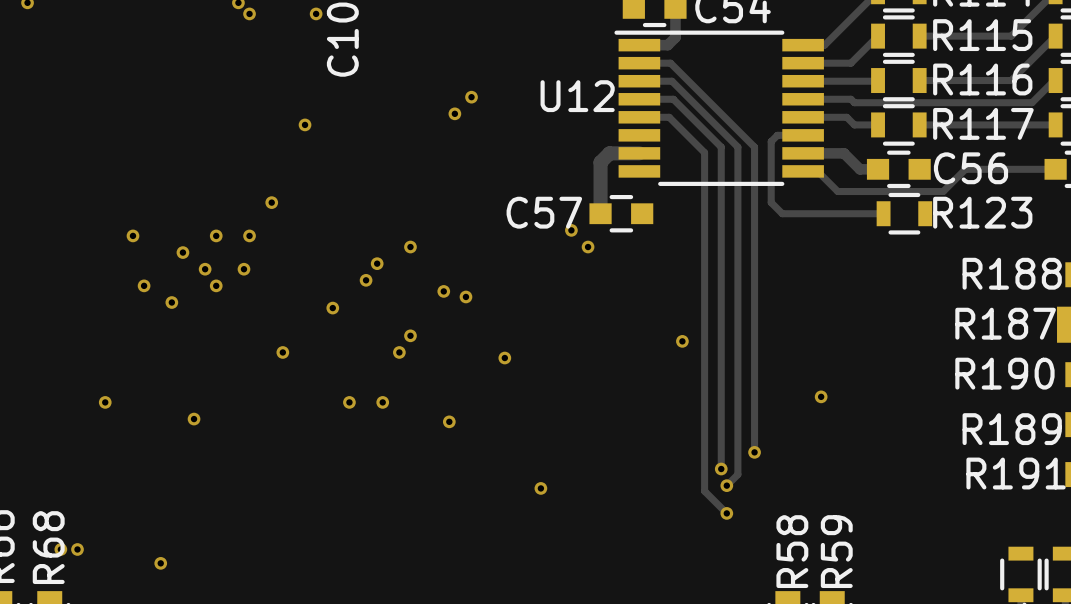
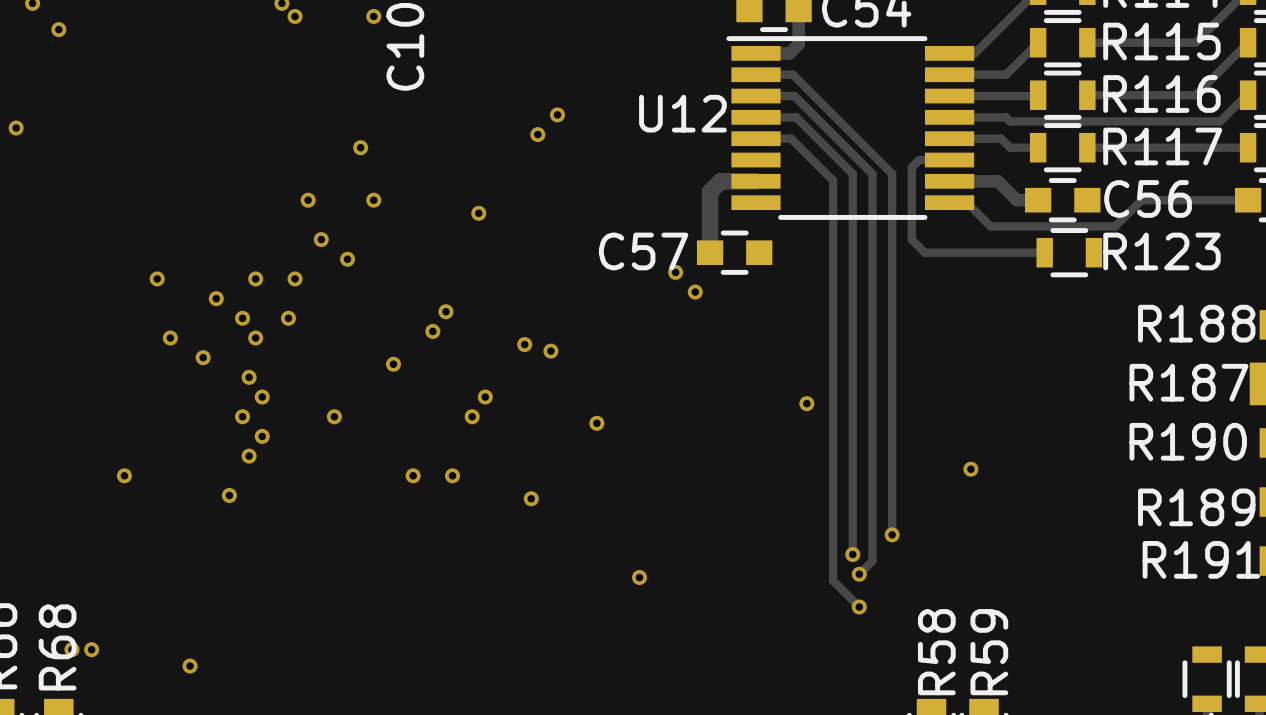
via: none -> (58, 29)
via: none -> (16, 128)
via: none -> (308, 200)
via: none -> (373, 200)
via: none -> (478, 213)
via: none -> (347, 259)
via: (410, 247) -> none
via: none -> (249, 377)
via: none -> (262, 397)
via: none -> (242, 416)
via: none -> (262, 436)
via: none -> (249, 456)

